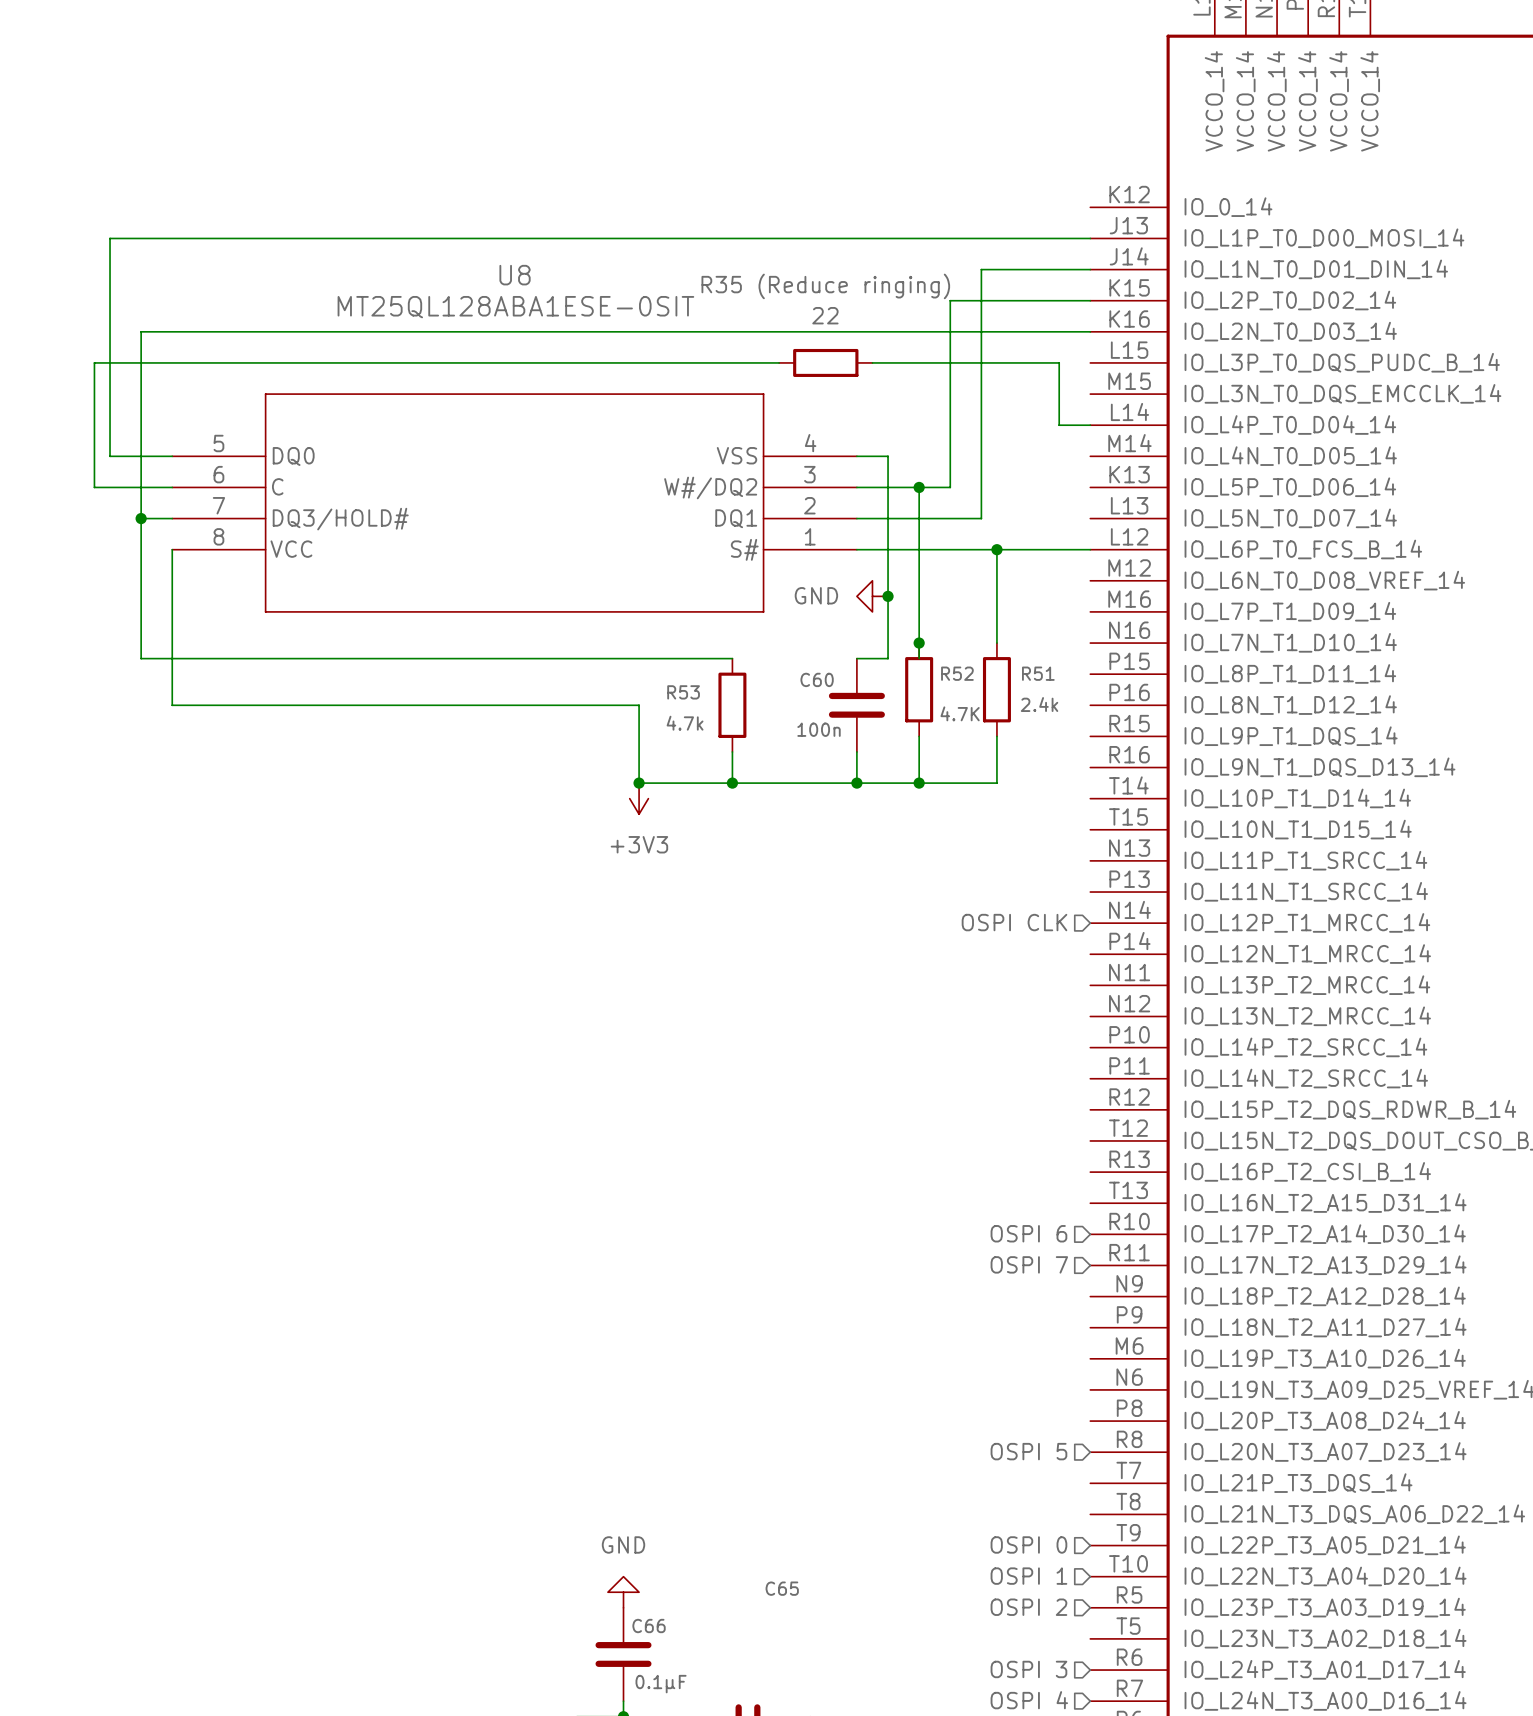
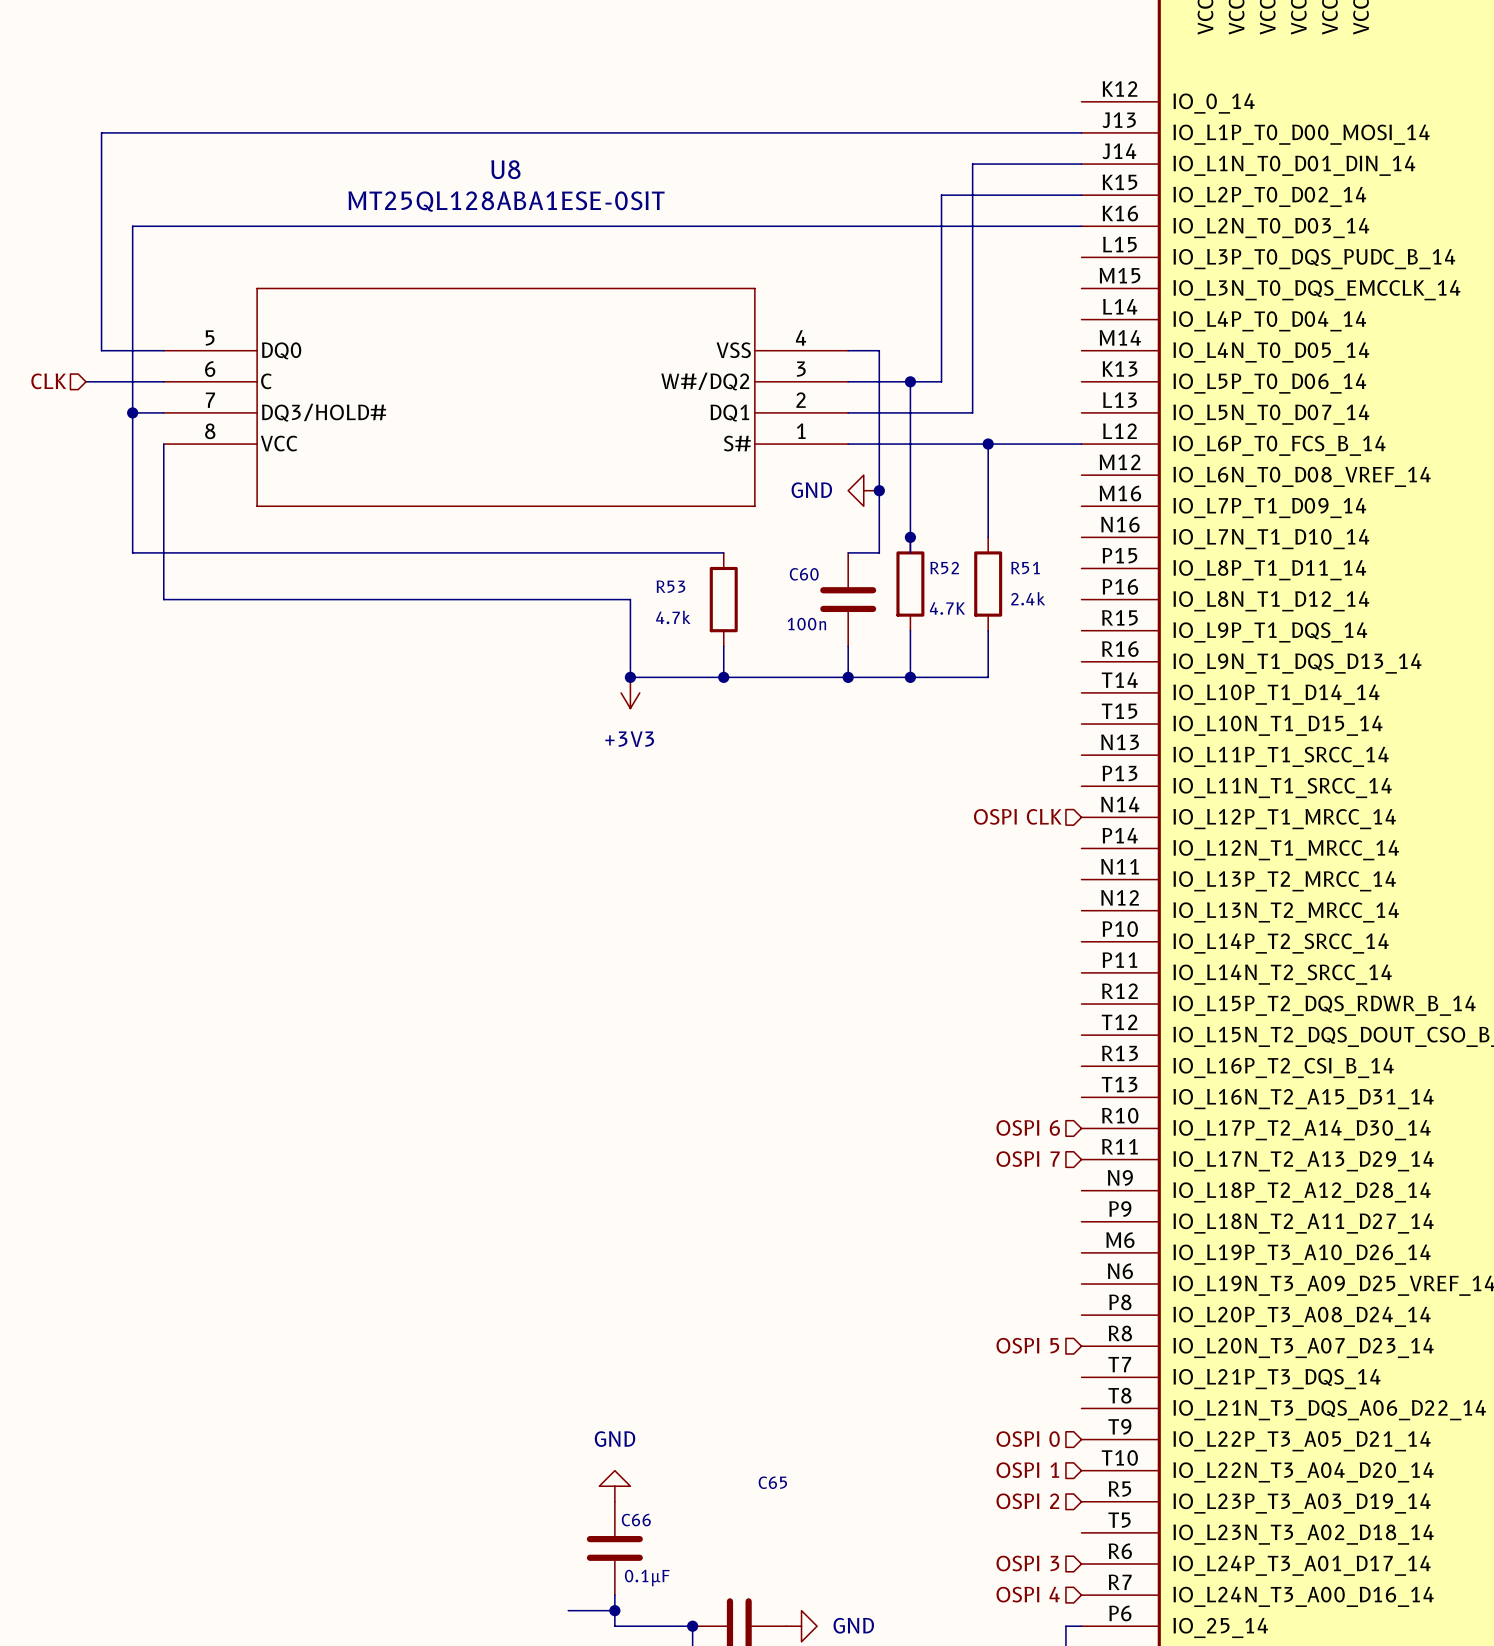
wire: (779, 362) (94, 362) (94, 487) -> none
R35 (Reduce ringing): 22 (825, 362) -> none
wire: (872, 362) (1059, 362) (1059, 425) (1090, 425) -> none
hierarchical label: none -> CLK (48, 381)

